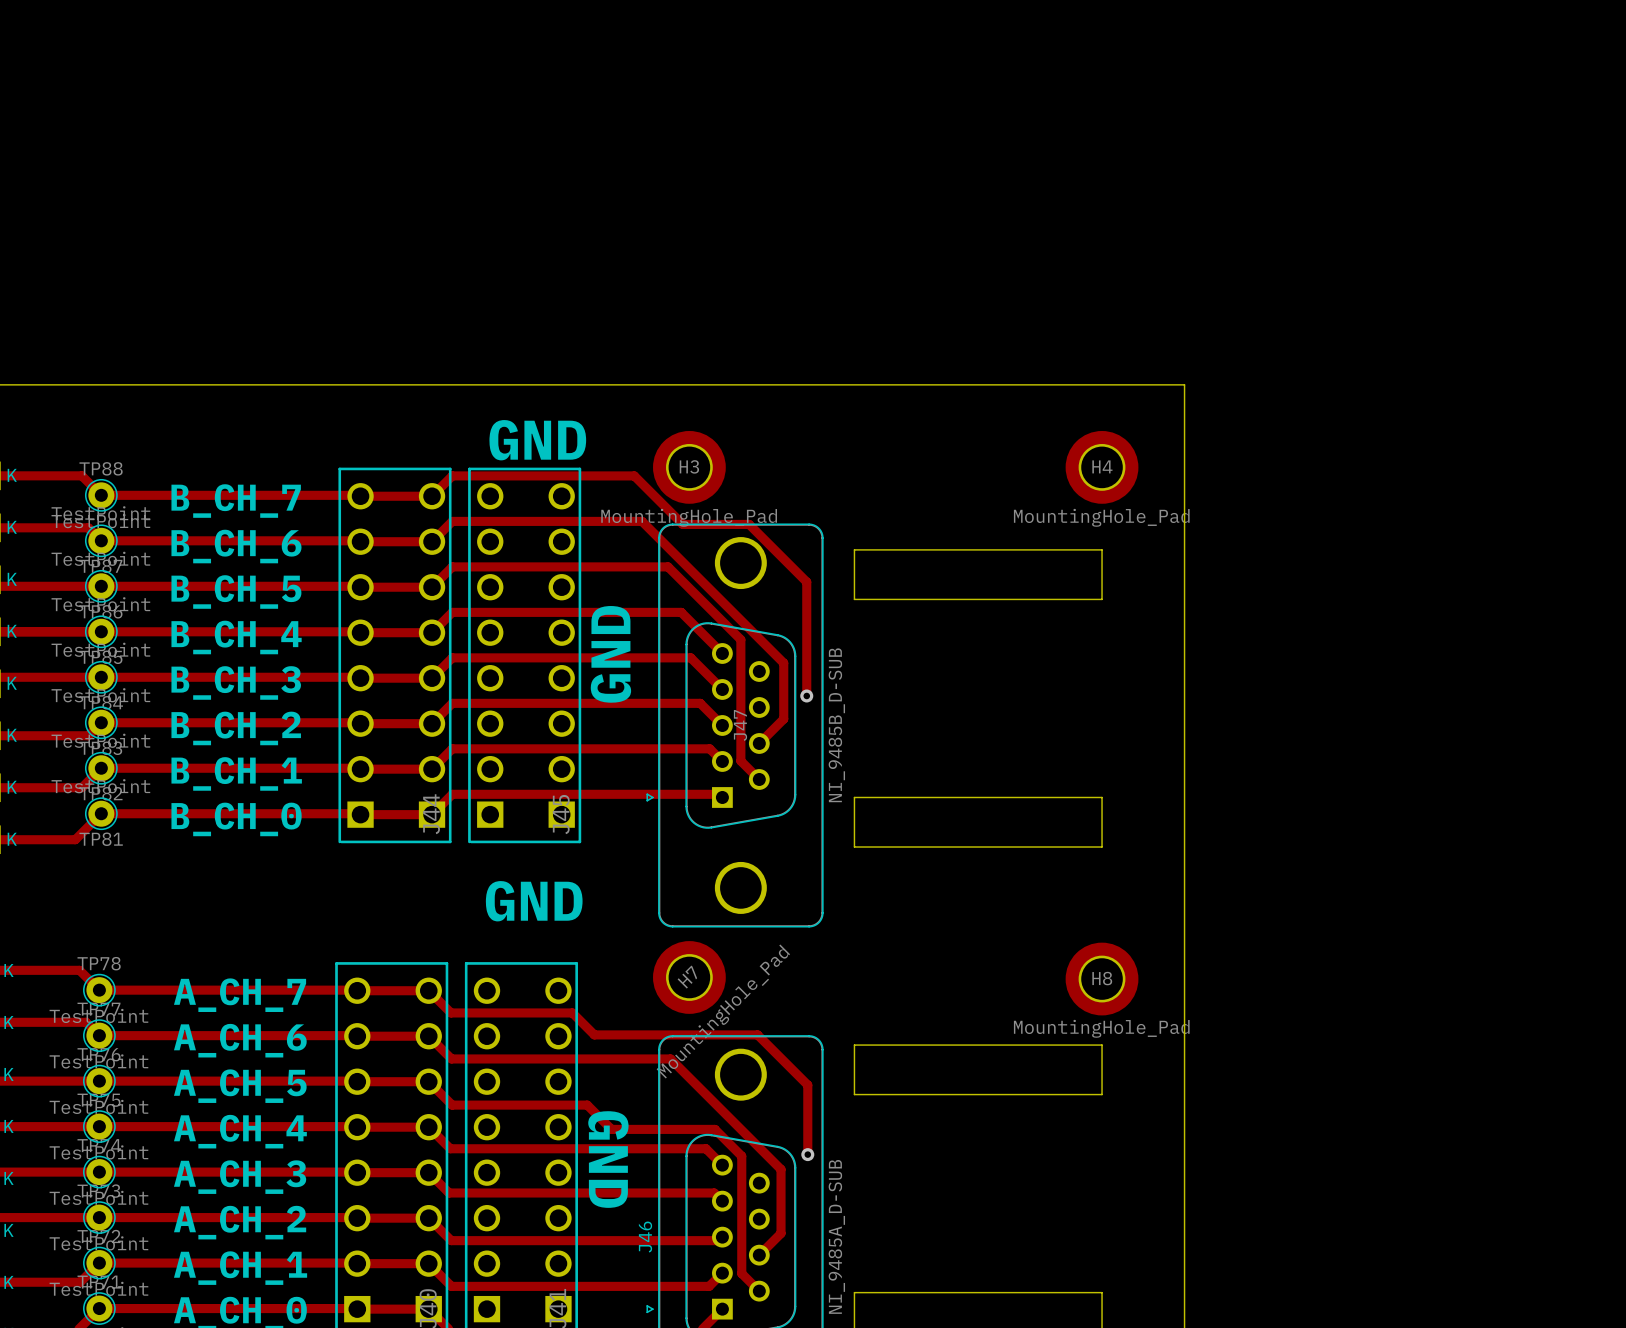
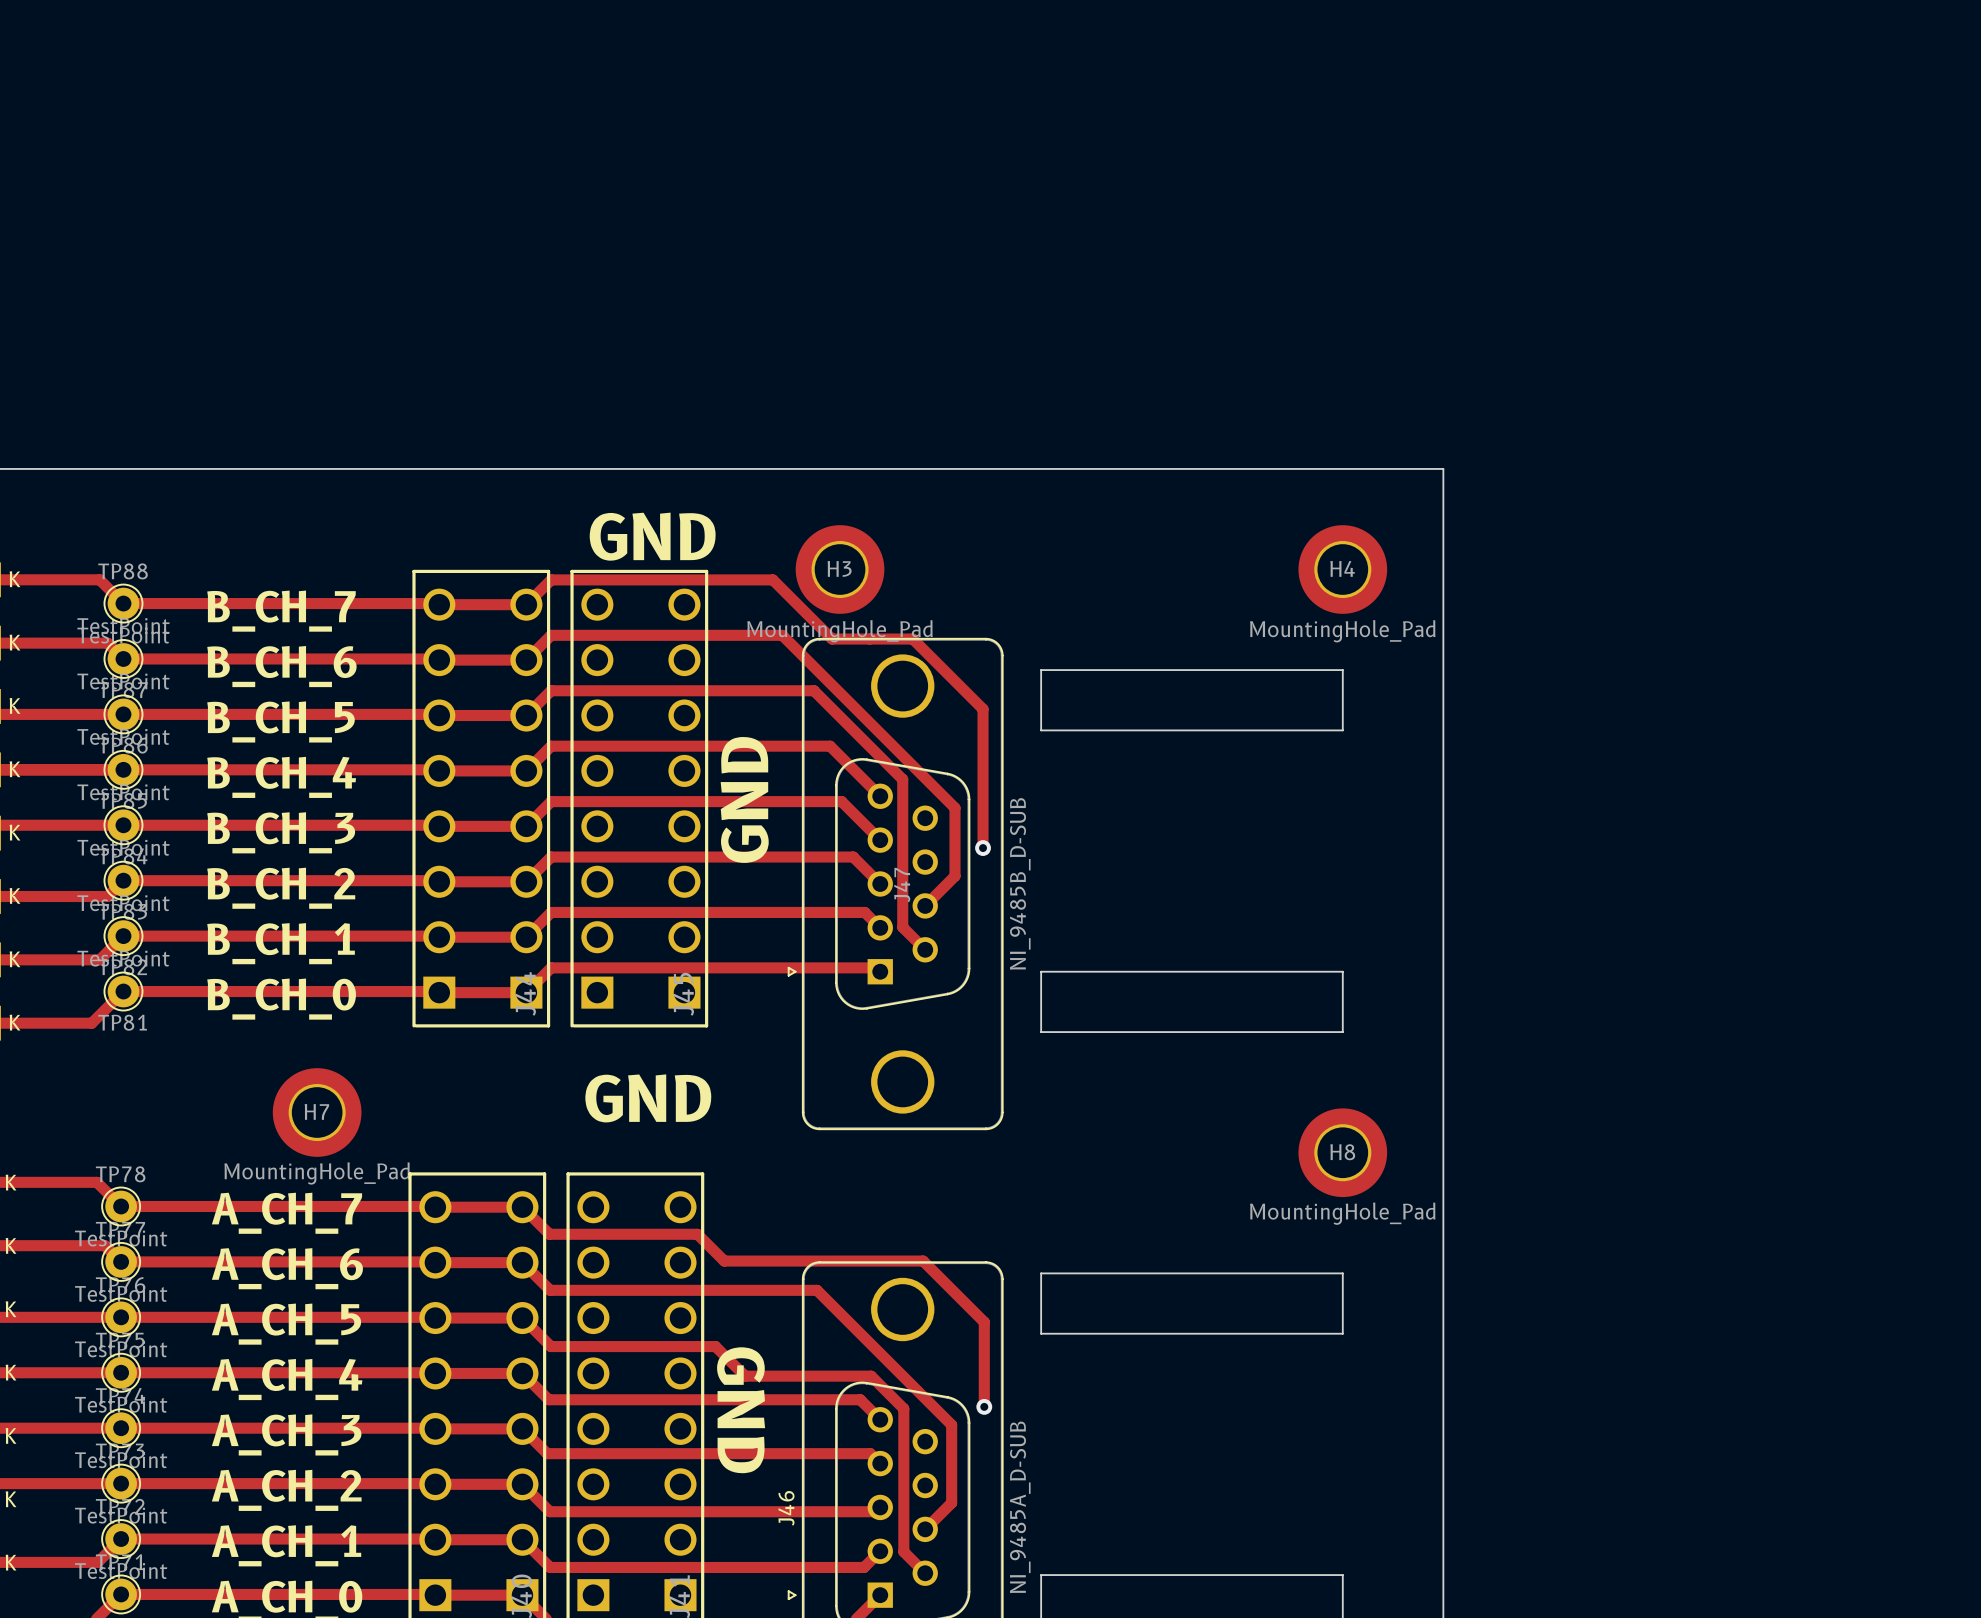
H7 name rotation: 0° (687, 977) -> 45° clockwise (316, 1111)
H7 position: (689, 977) -> (317, 1112)
H8 position: (1102, 979) -> (1342, 1152)
H7 value rotation: 0° (723, 1011) -> 45° clockwise (317, 1173)

